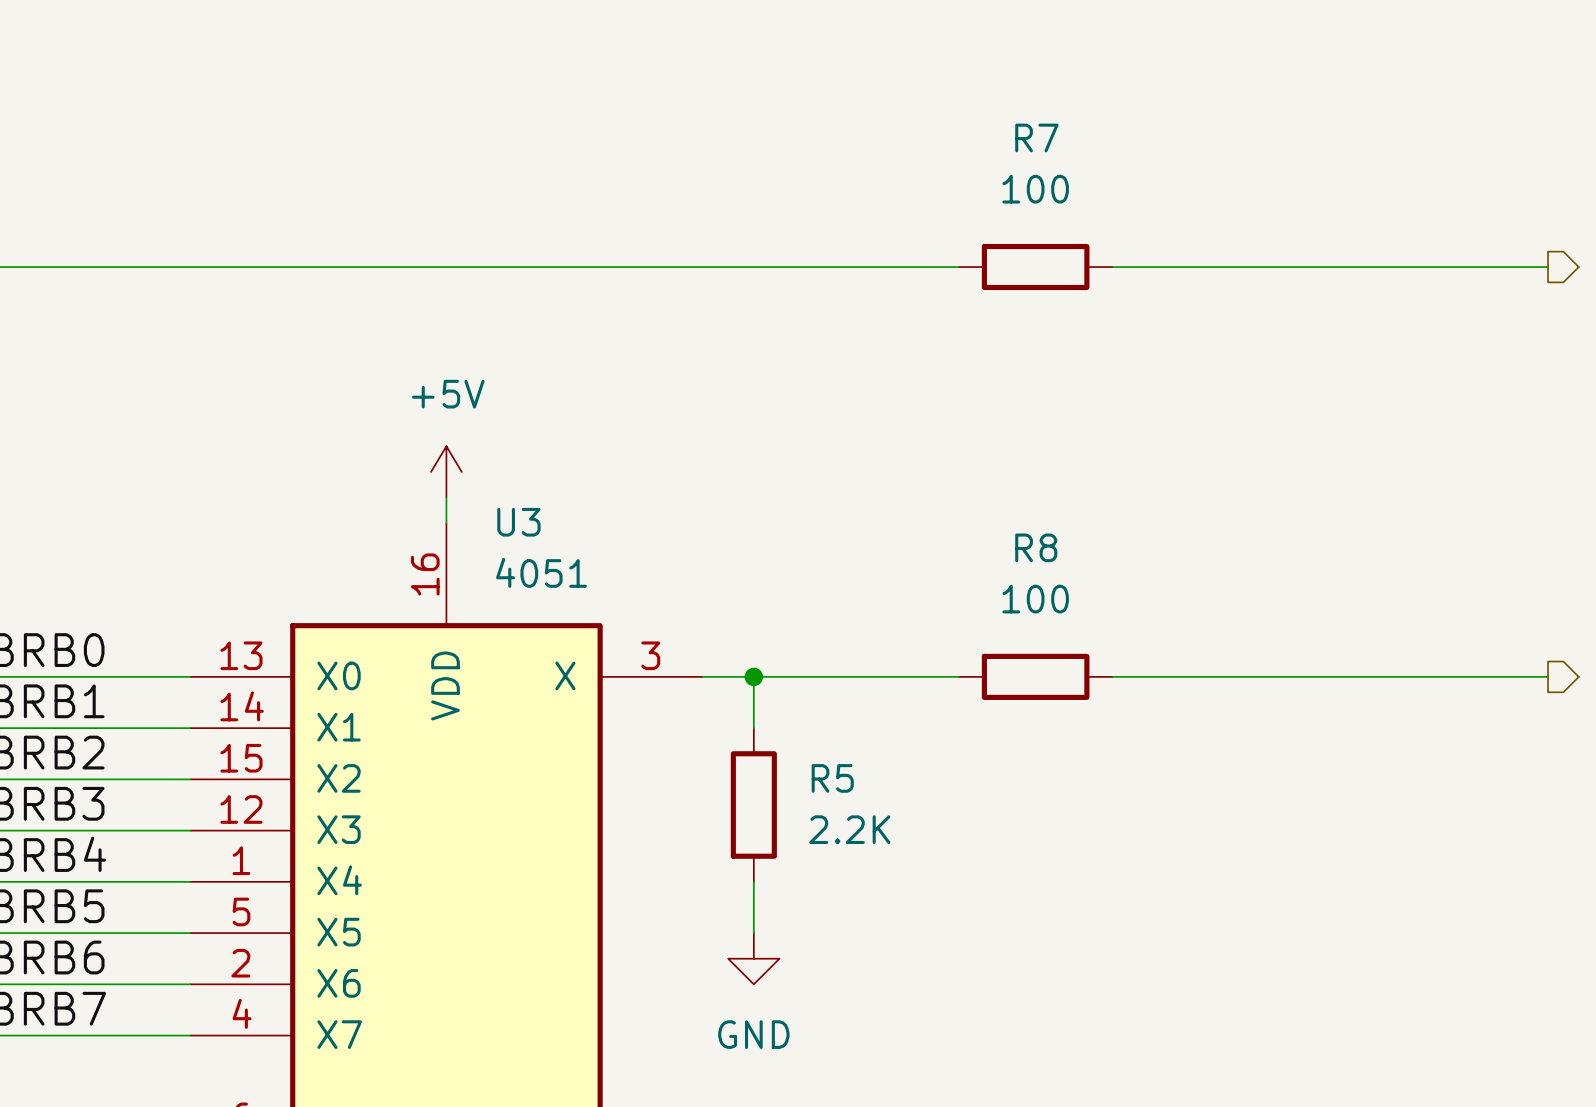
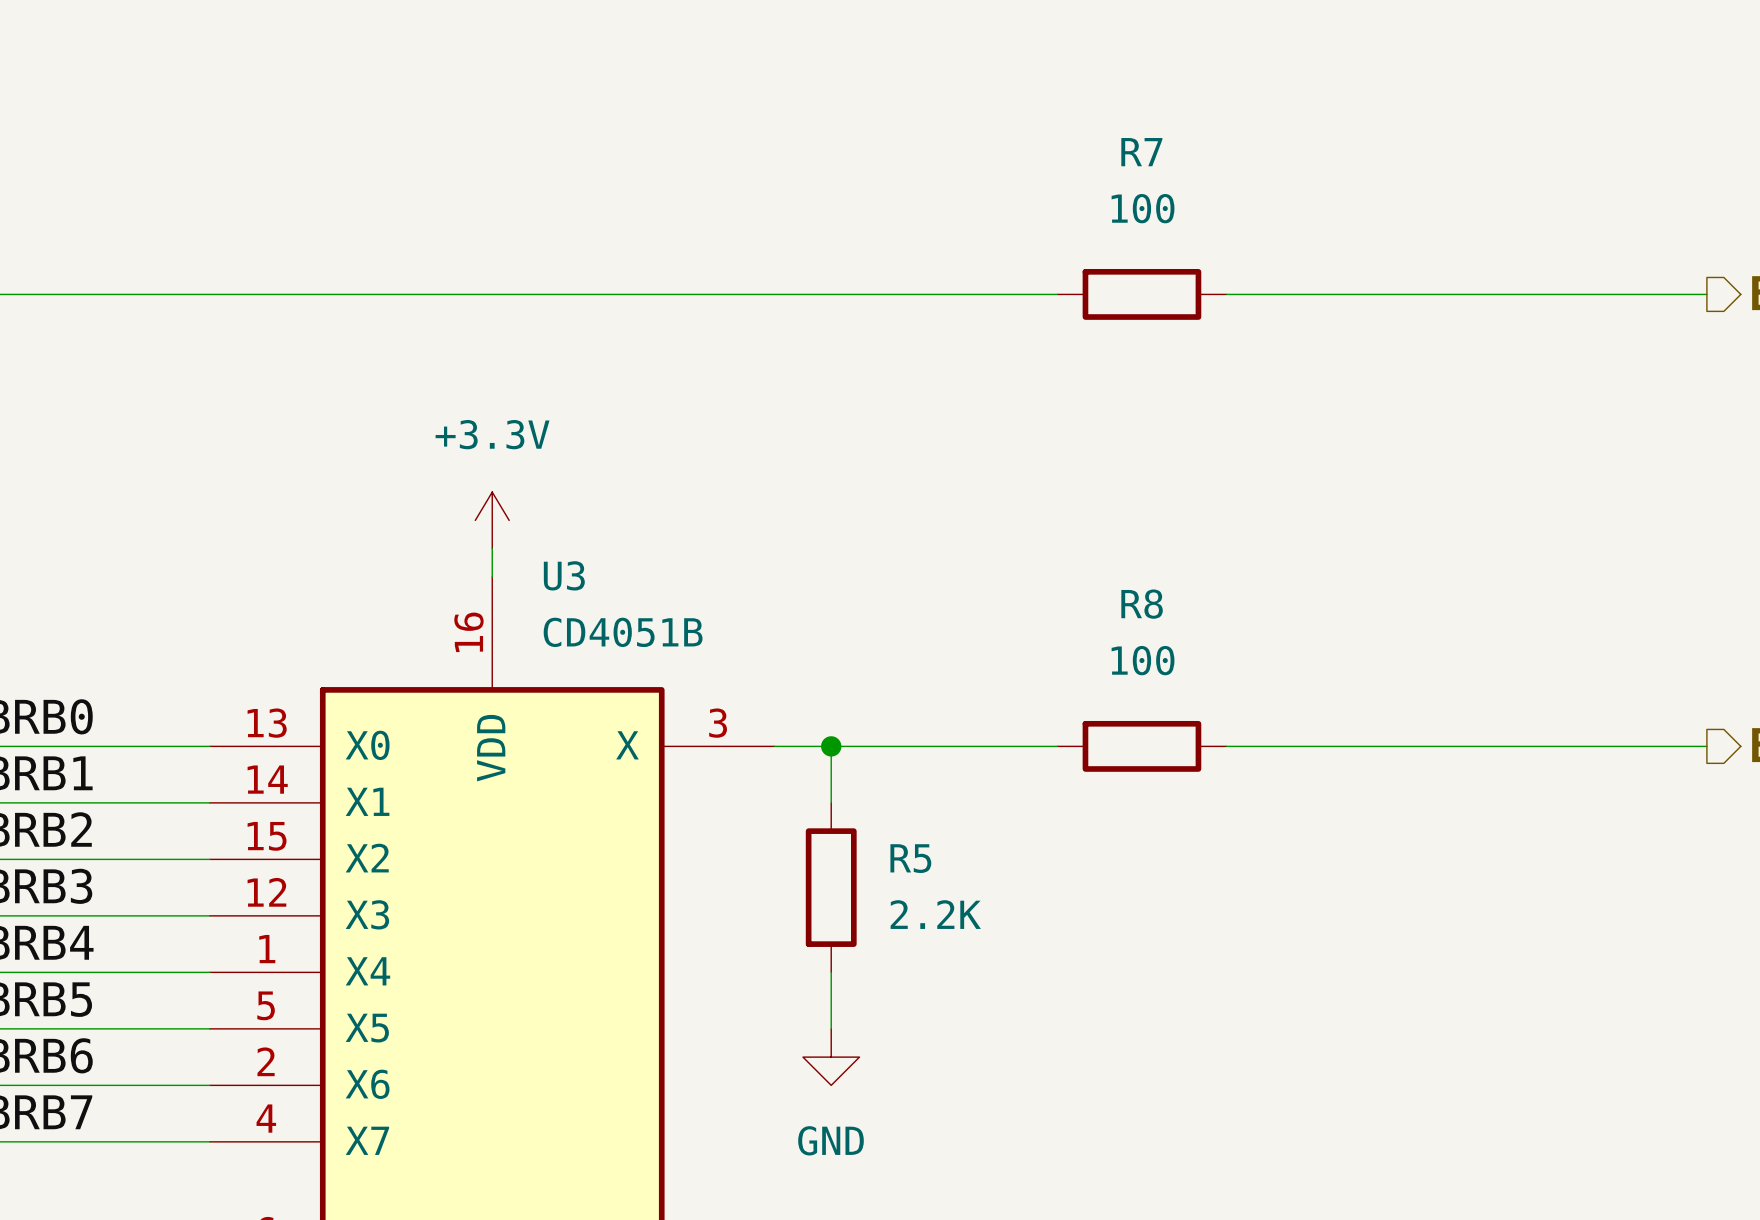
power symbol: +5V (446, 471) -> +3.3V (492, 520)
U3 value: 4051 (541, 572) -> CD4051B (623, 632)

